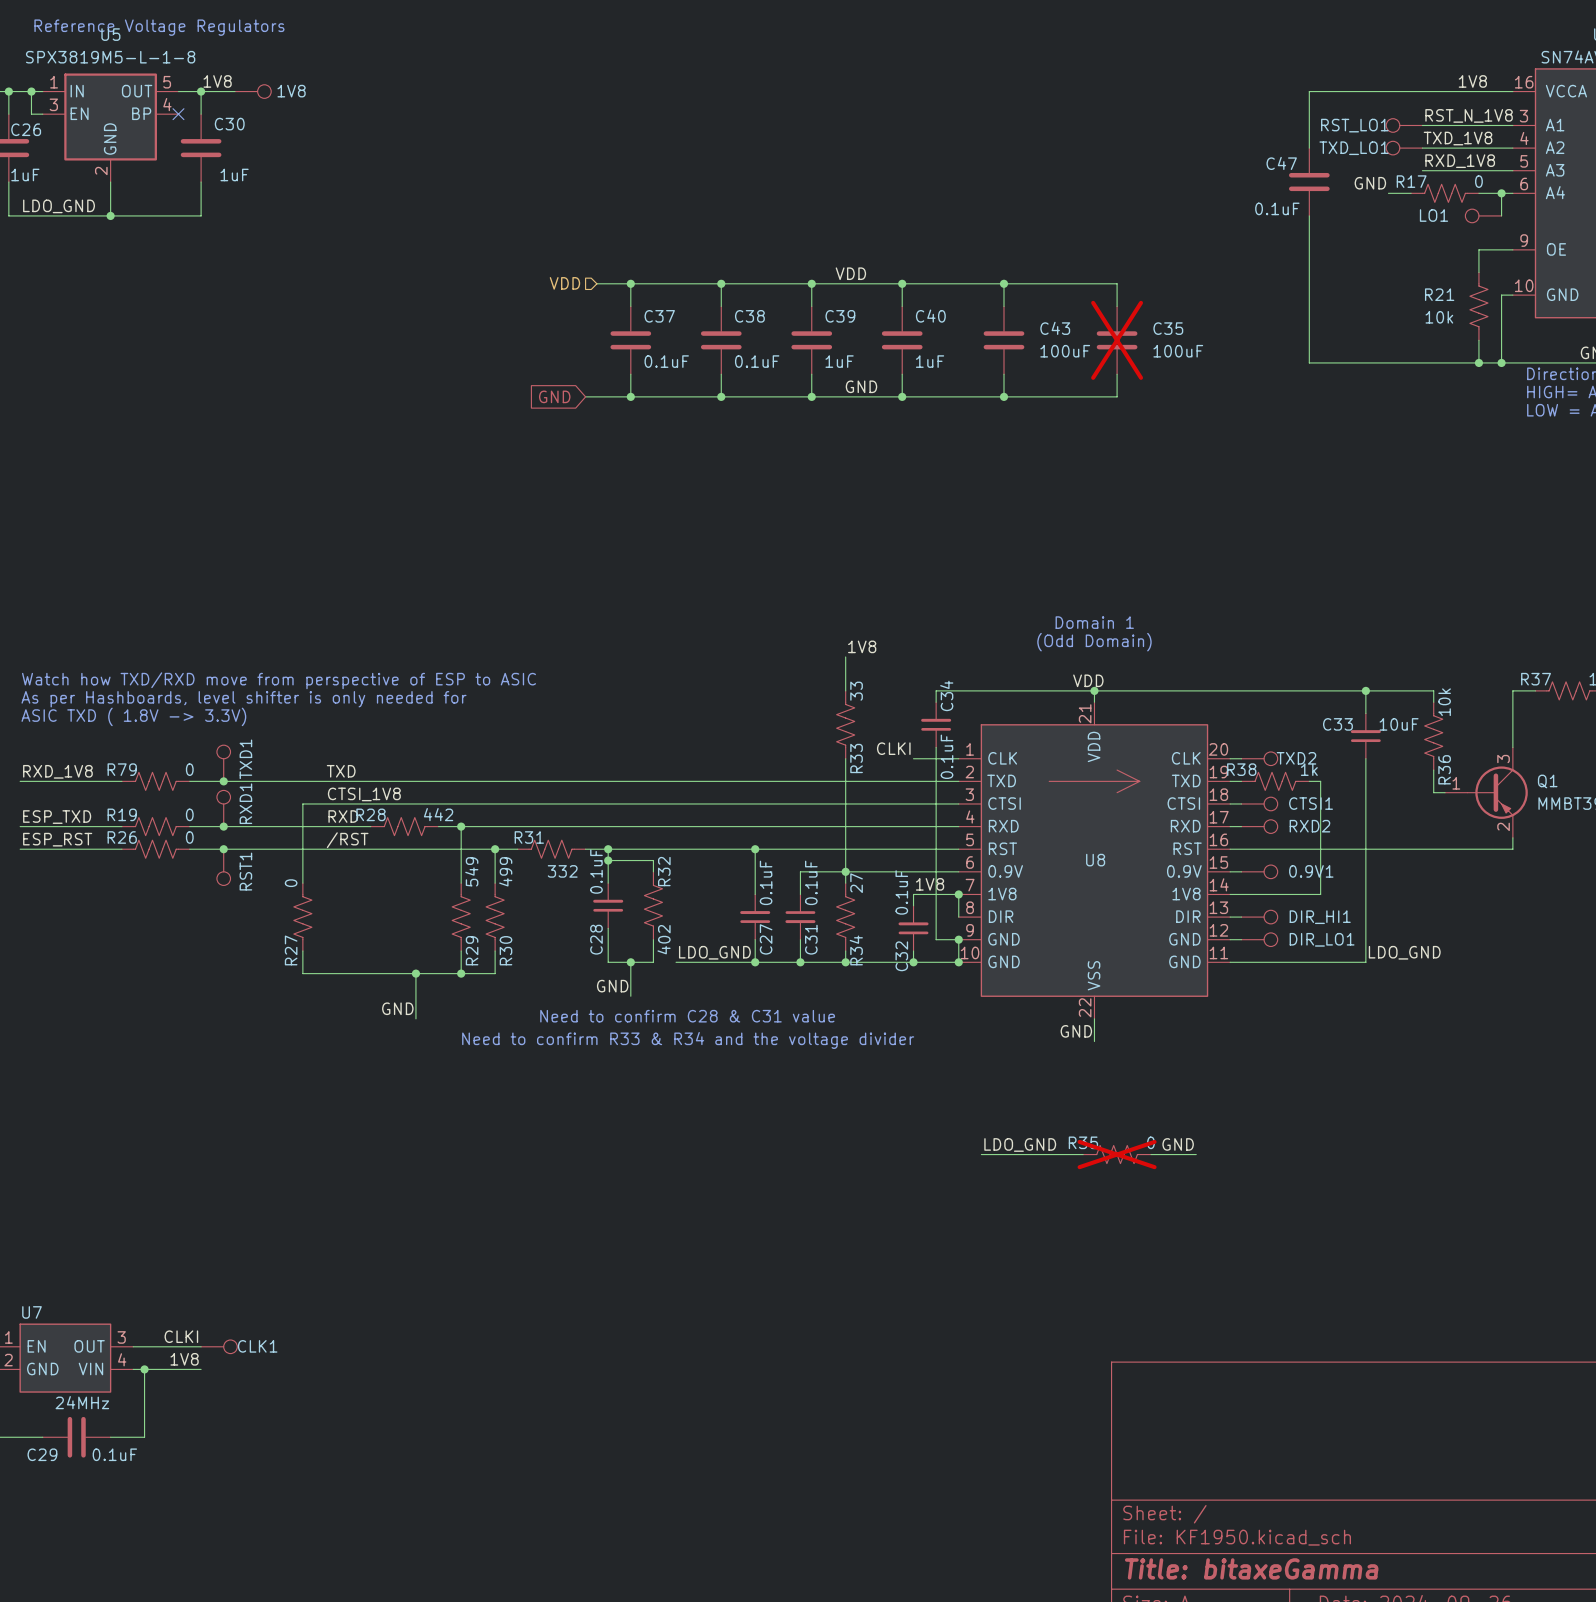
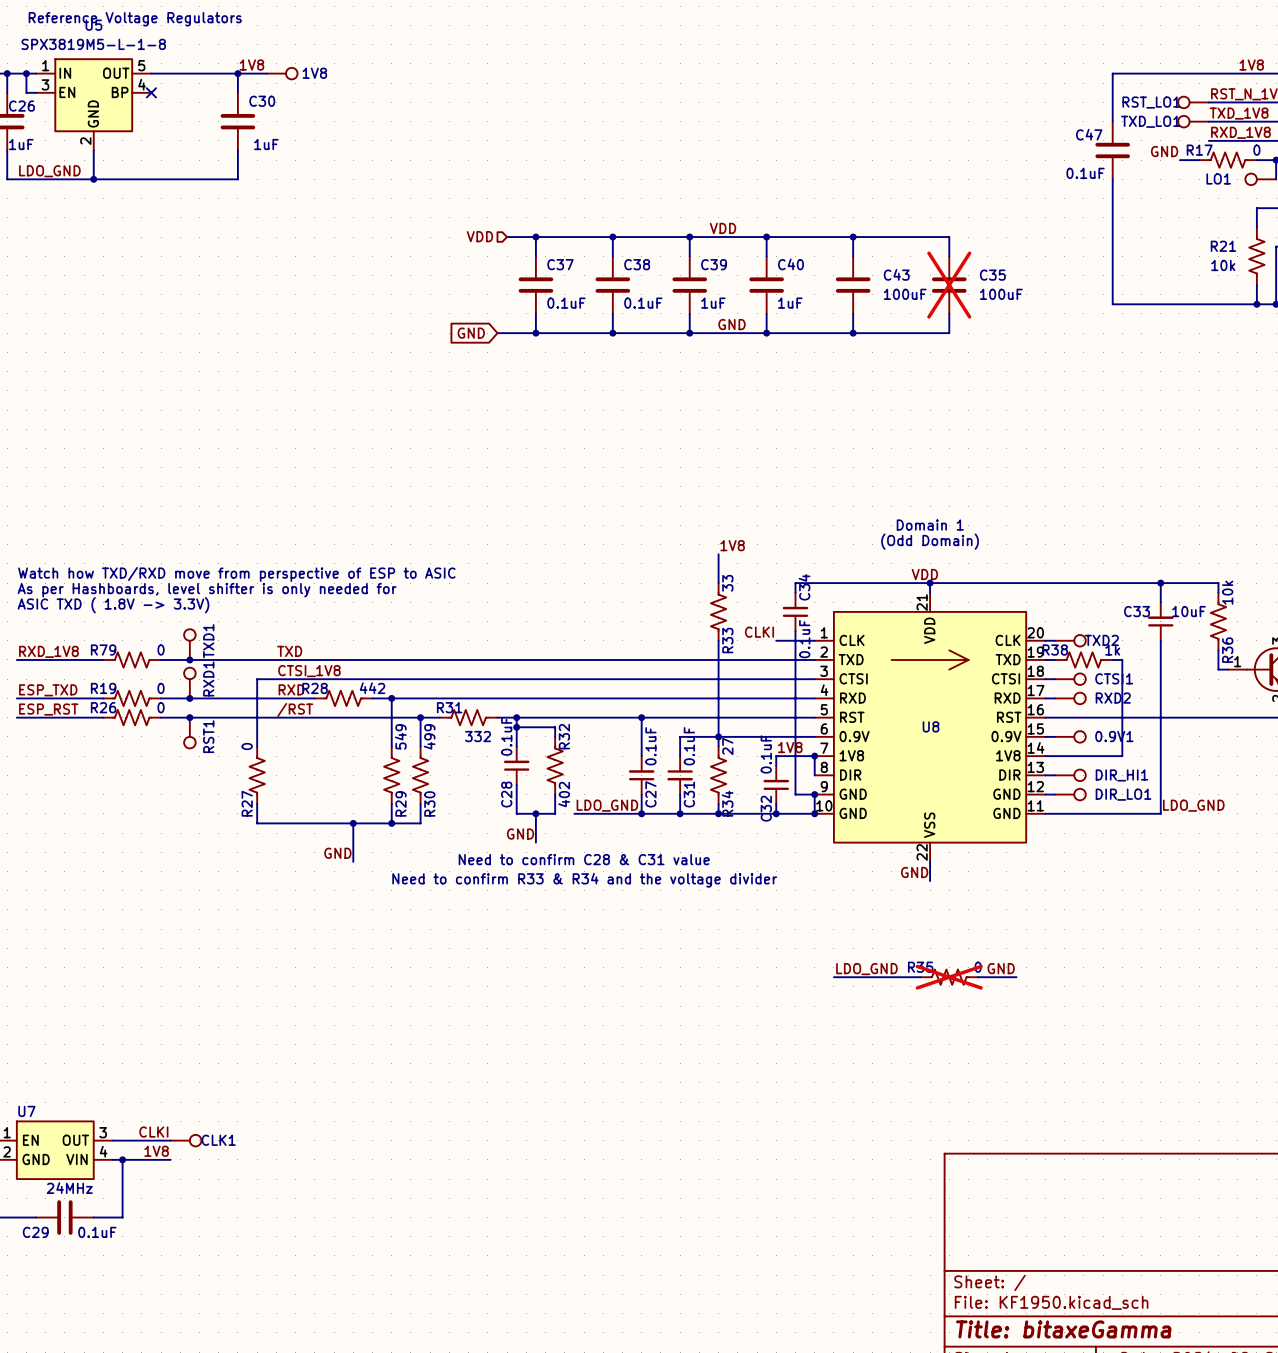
label position: 1V8 (217, 81) -> 1V8 (251, 65)
wire: (201, 91) (201, 114) -> (237, 73) (237, 92)
junction: (201, 91) -> none
wire: none -> (199, 73) (266, 73)
1V8 position: (253, 91) -> (282, 73)
junction: none -> (237, 73)
C30 position: (201, 148) -> (237, 121)
wire: (201, 182) (201, 215) -> (237, 150) (237, 179) (170, 179)

